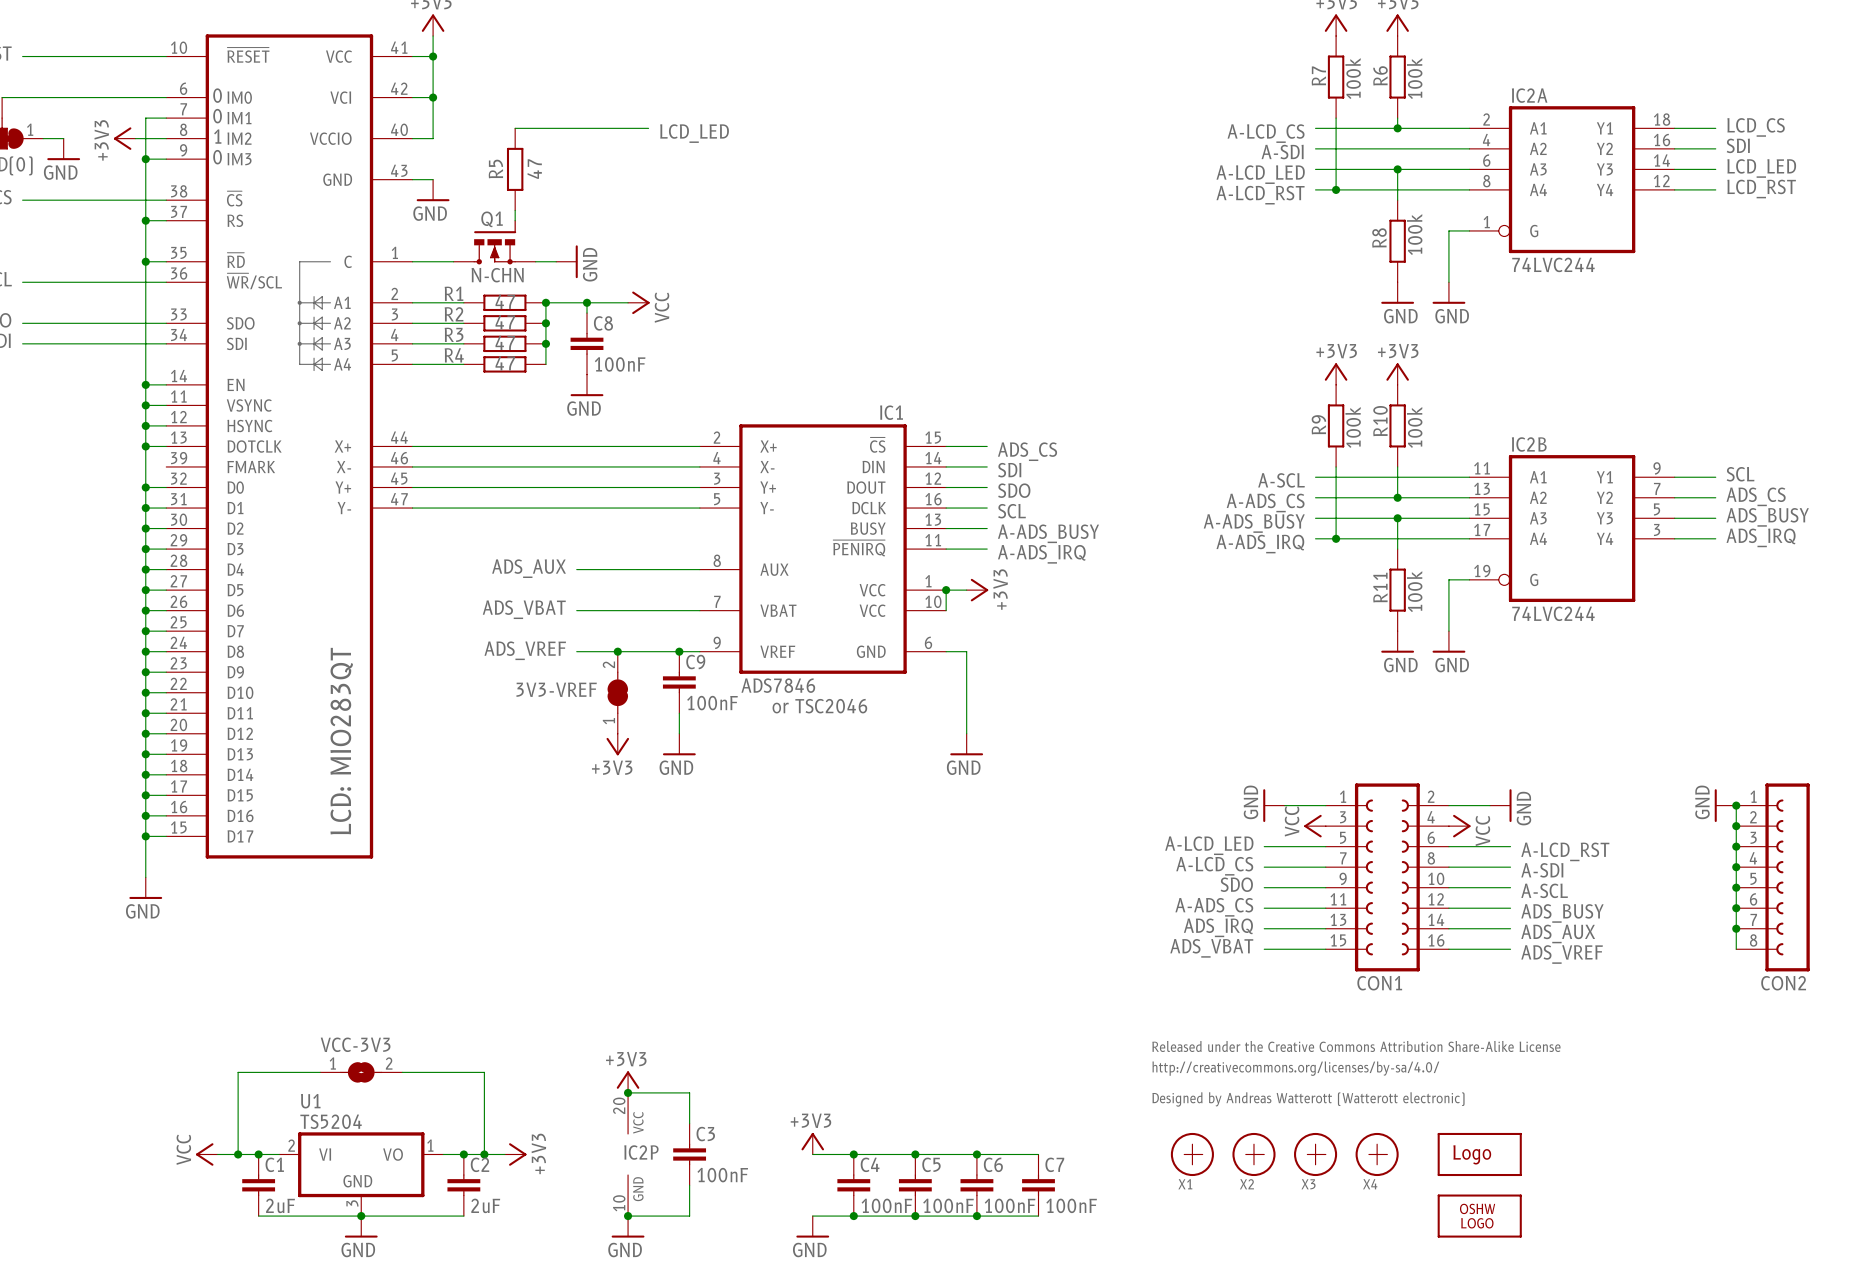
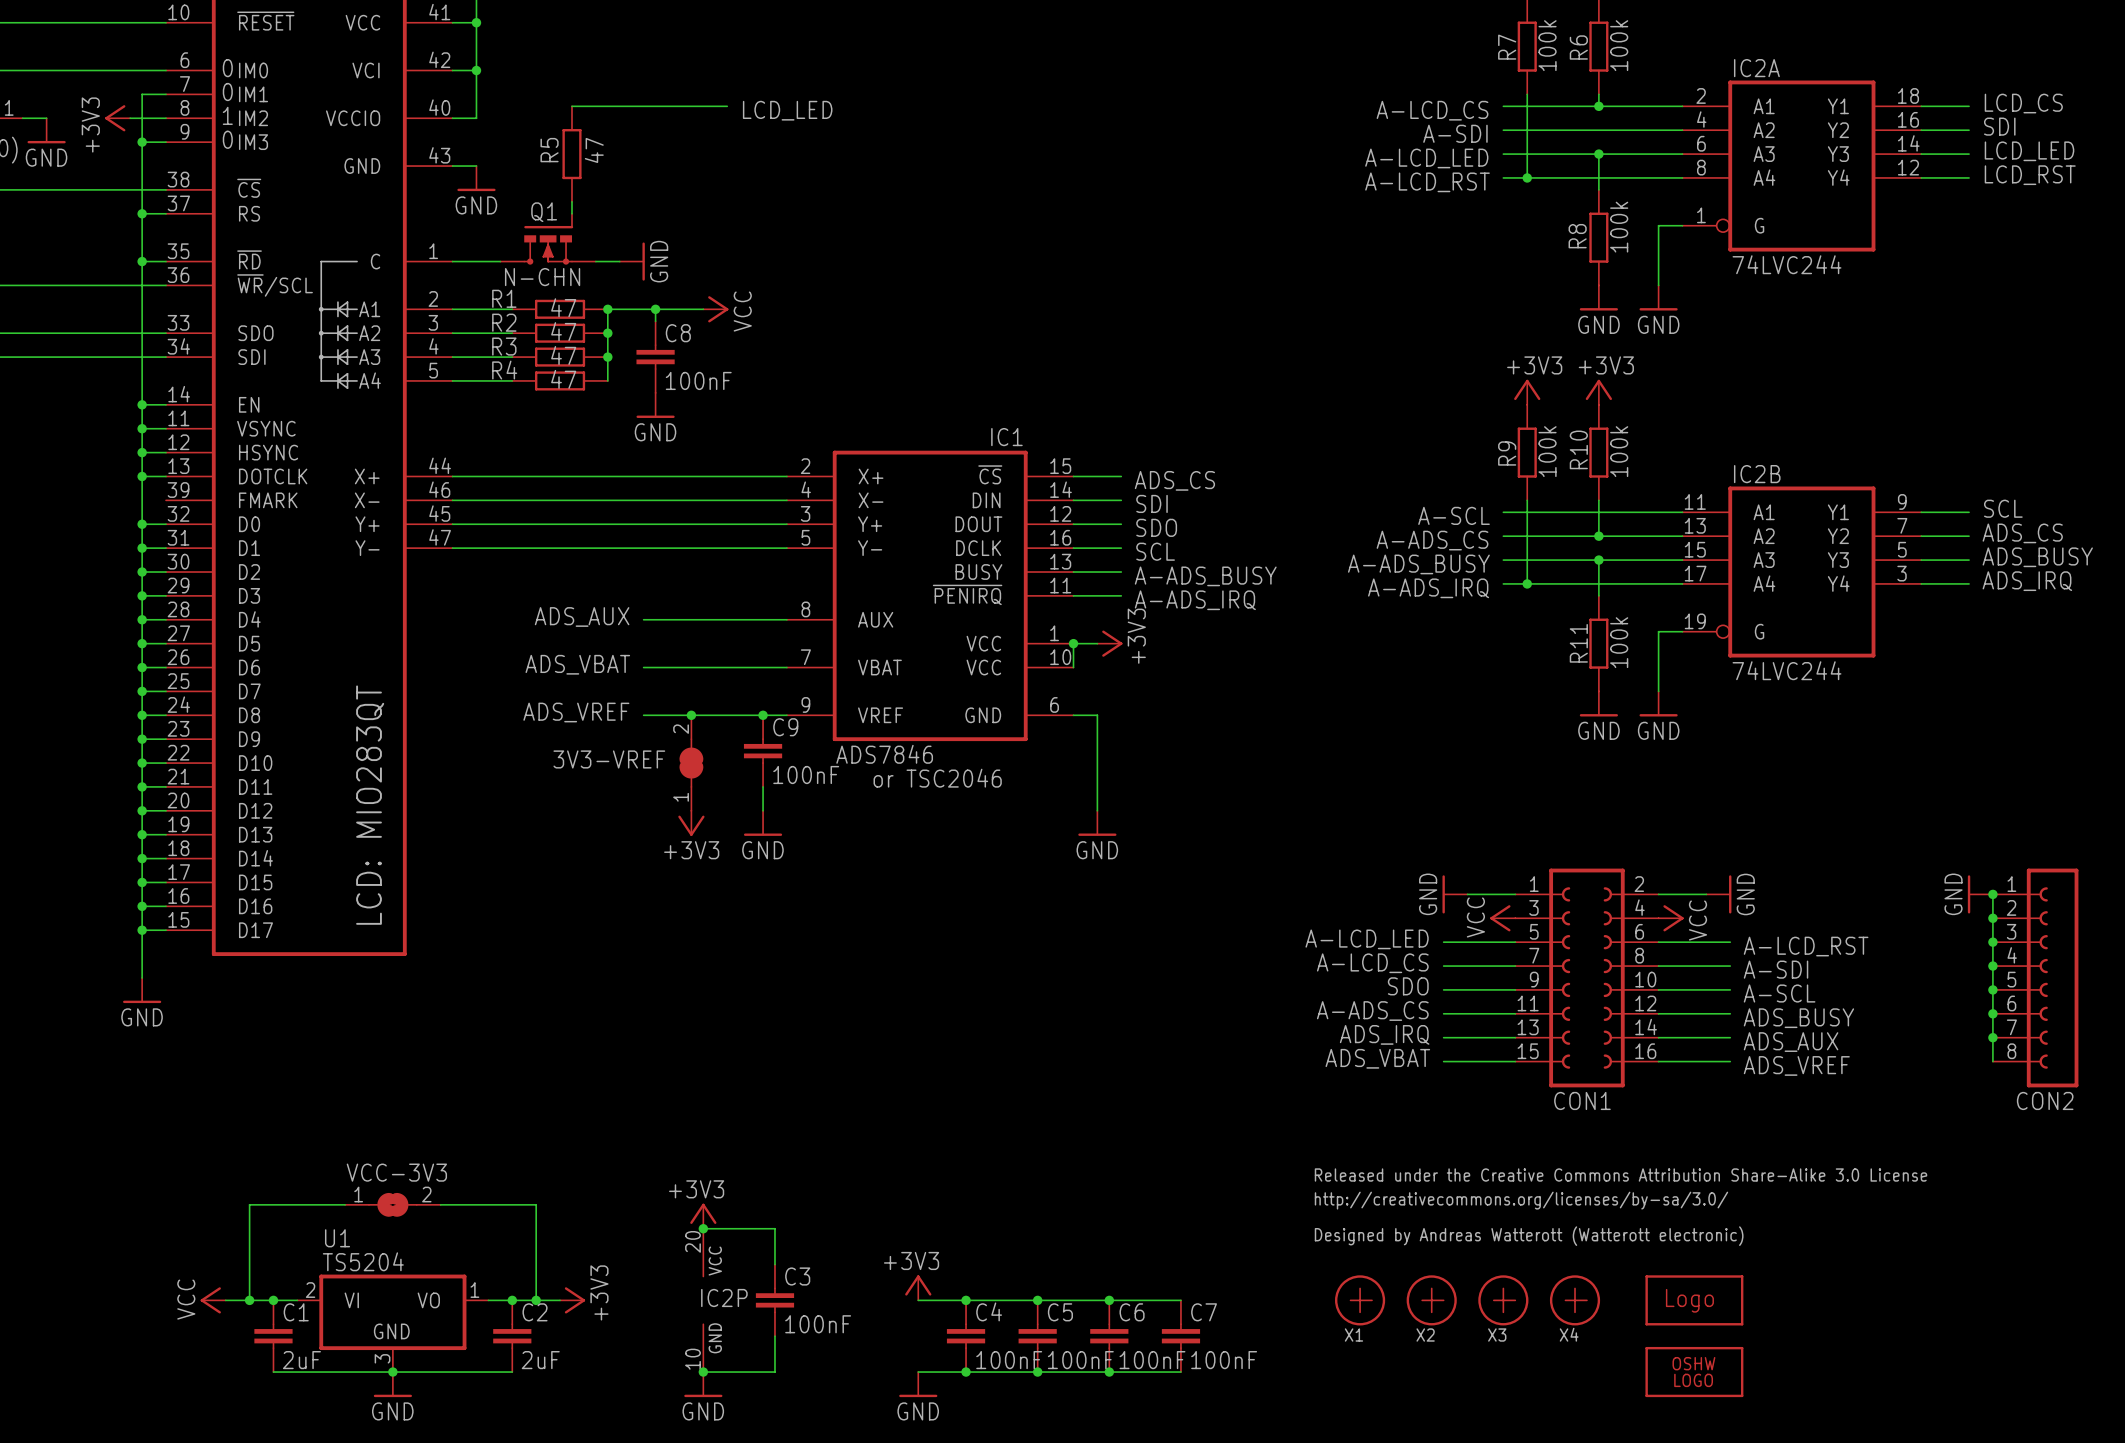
text: Released under the Creative Commons Attribution Share-Alike License (1356, 1046) -> Released under the Creative Commons Attribution Share-Alike 3.0 License (1621, 1175)
text: http://creativecommons.org/licenses/by-sa/4.0/ (1295, 1068) -> http://creativecommons.org/licenses/by-sa/3.0/ (1521, 1200)

